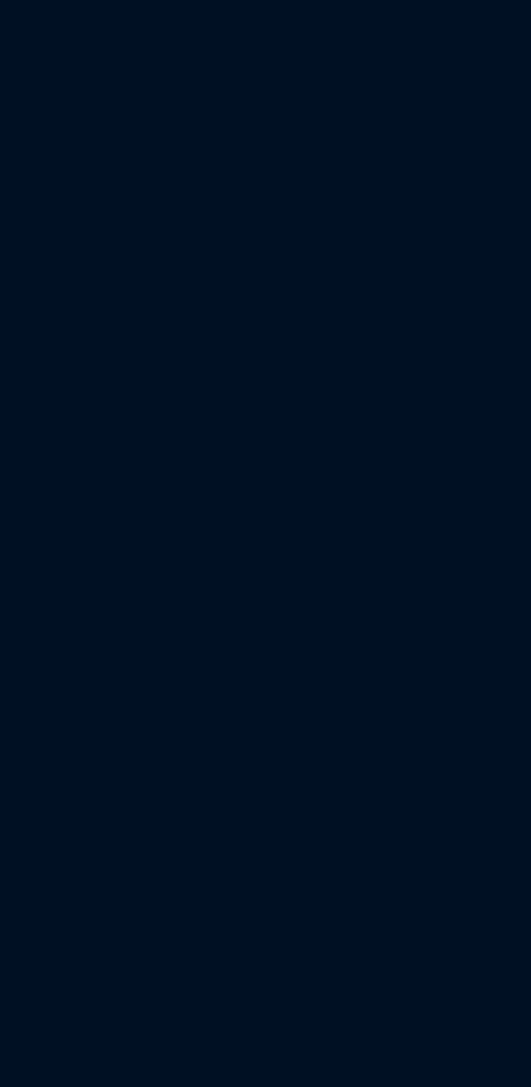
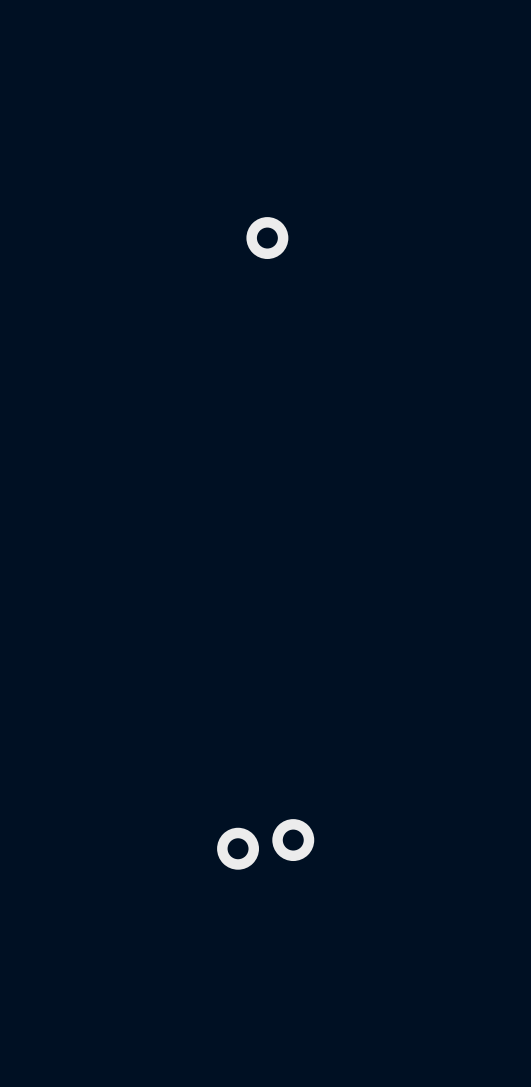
via: none -> (267, 238)
via: none -> (293, 840)
via: none -> (238, 848)

